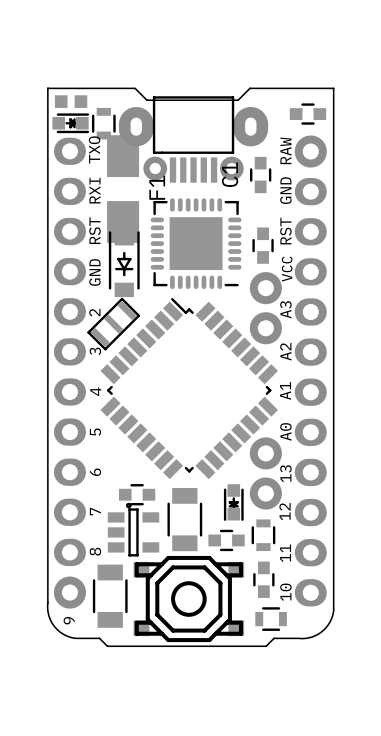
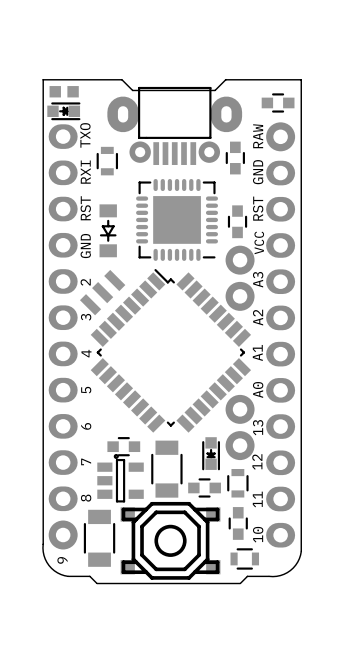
part position: (103, 123) -> (107, 161)
C1 name: C1 (230, 174) -> none
F1: (123, 189) -> none
part footprint: [108, 231, 140, 298] -> [99, 204, 117, 258]
part footprint: [87, 297, 141, 351] -> [79, 269, 126, 316]

